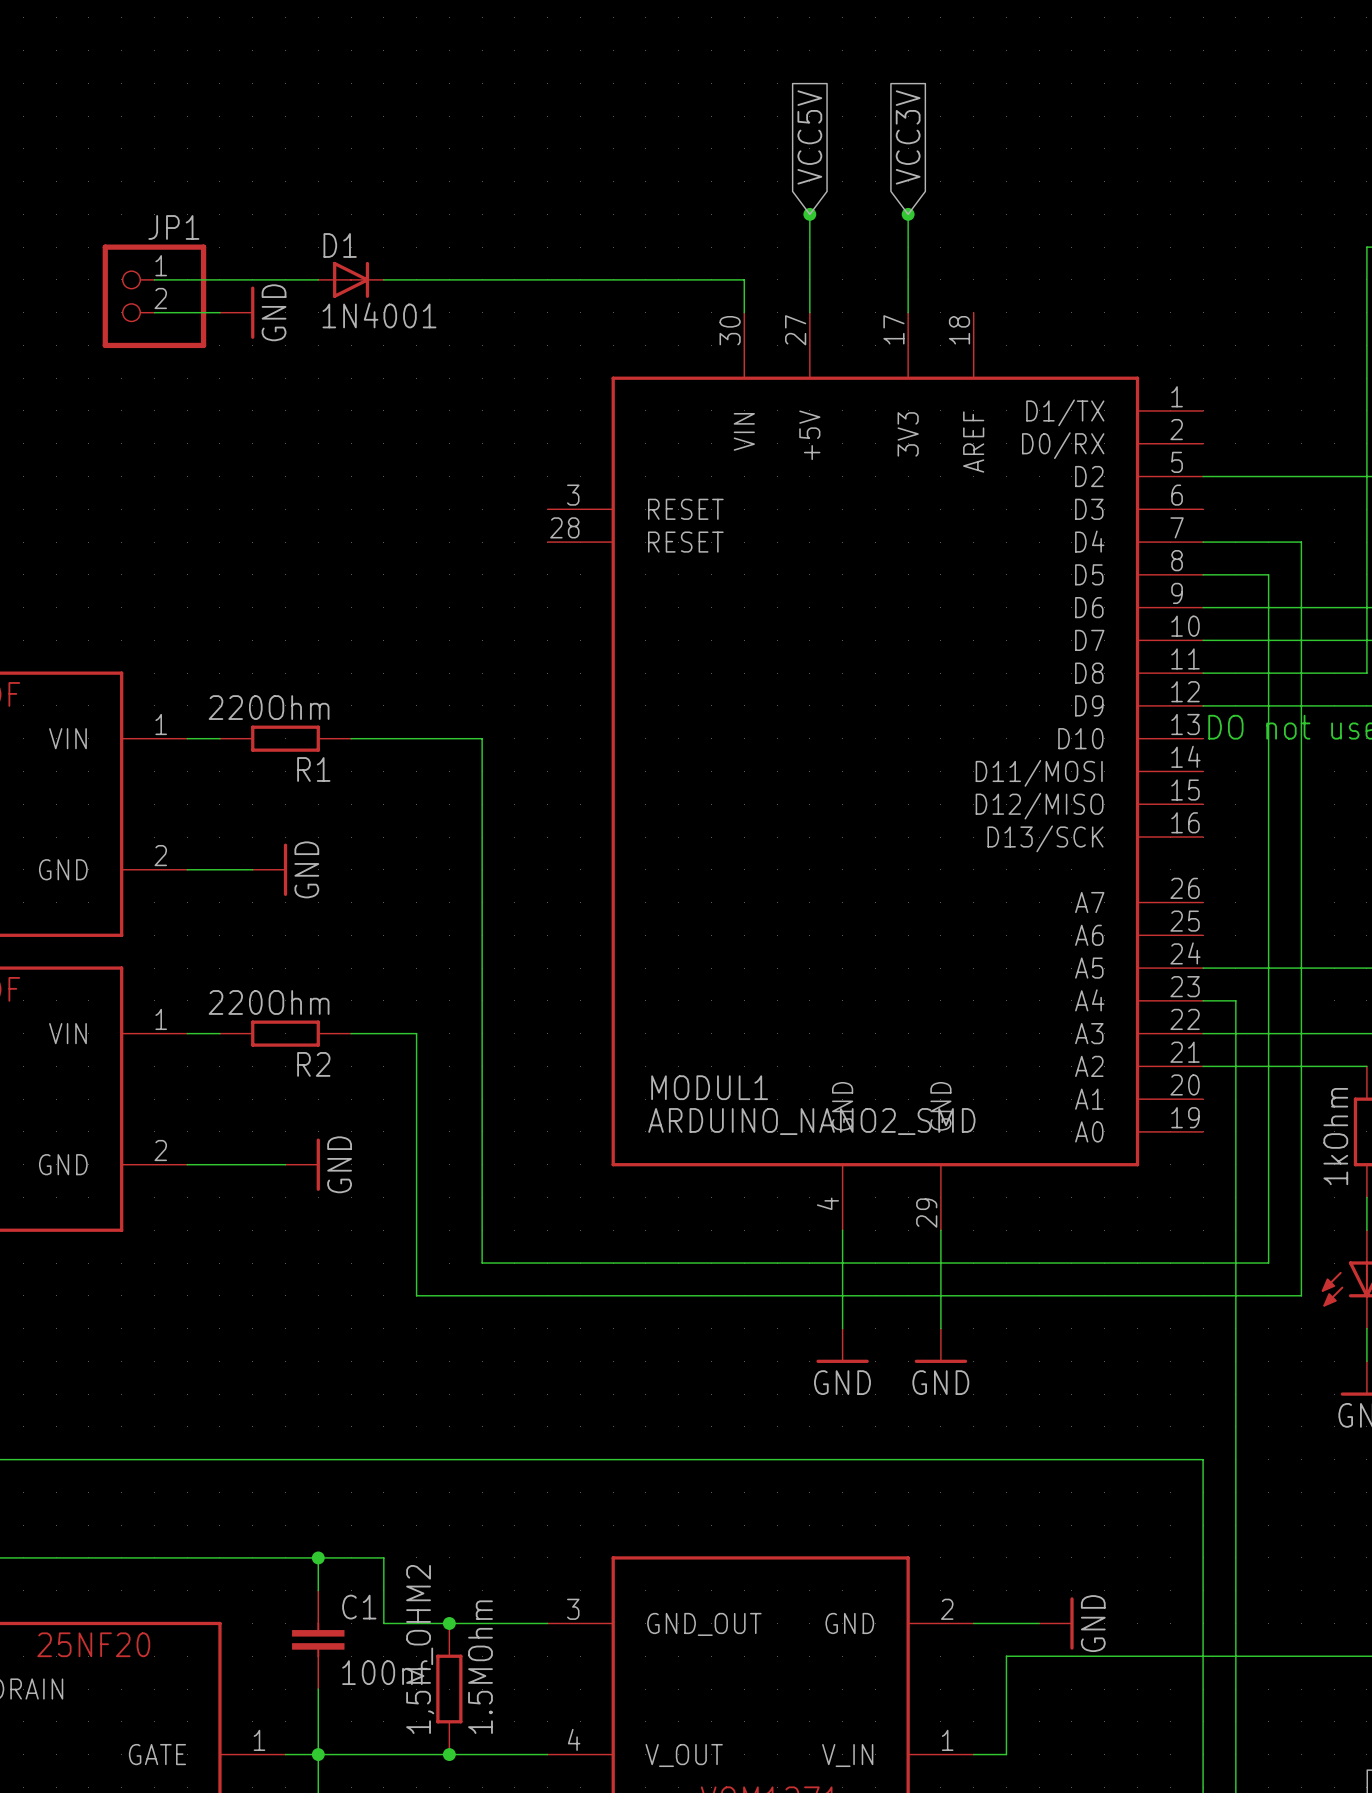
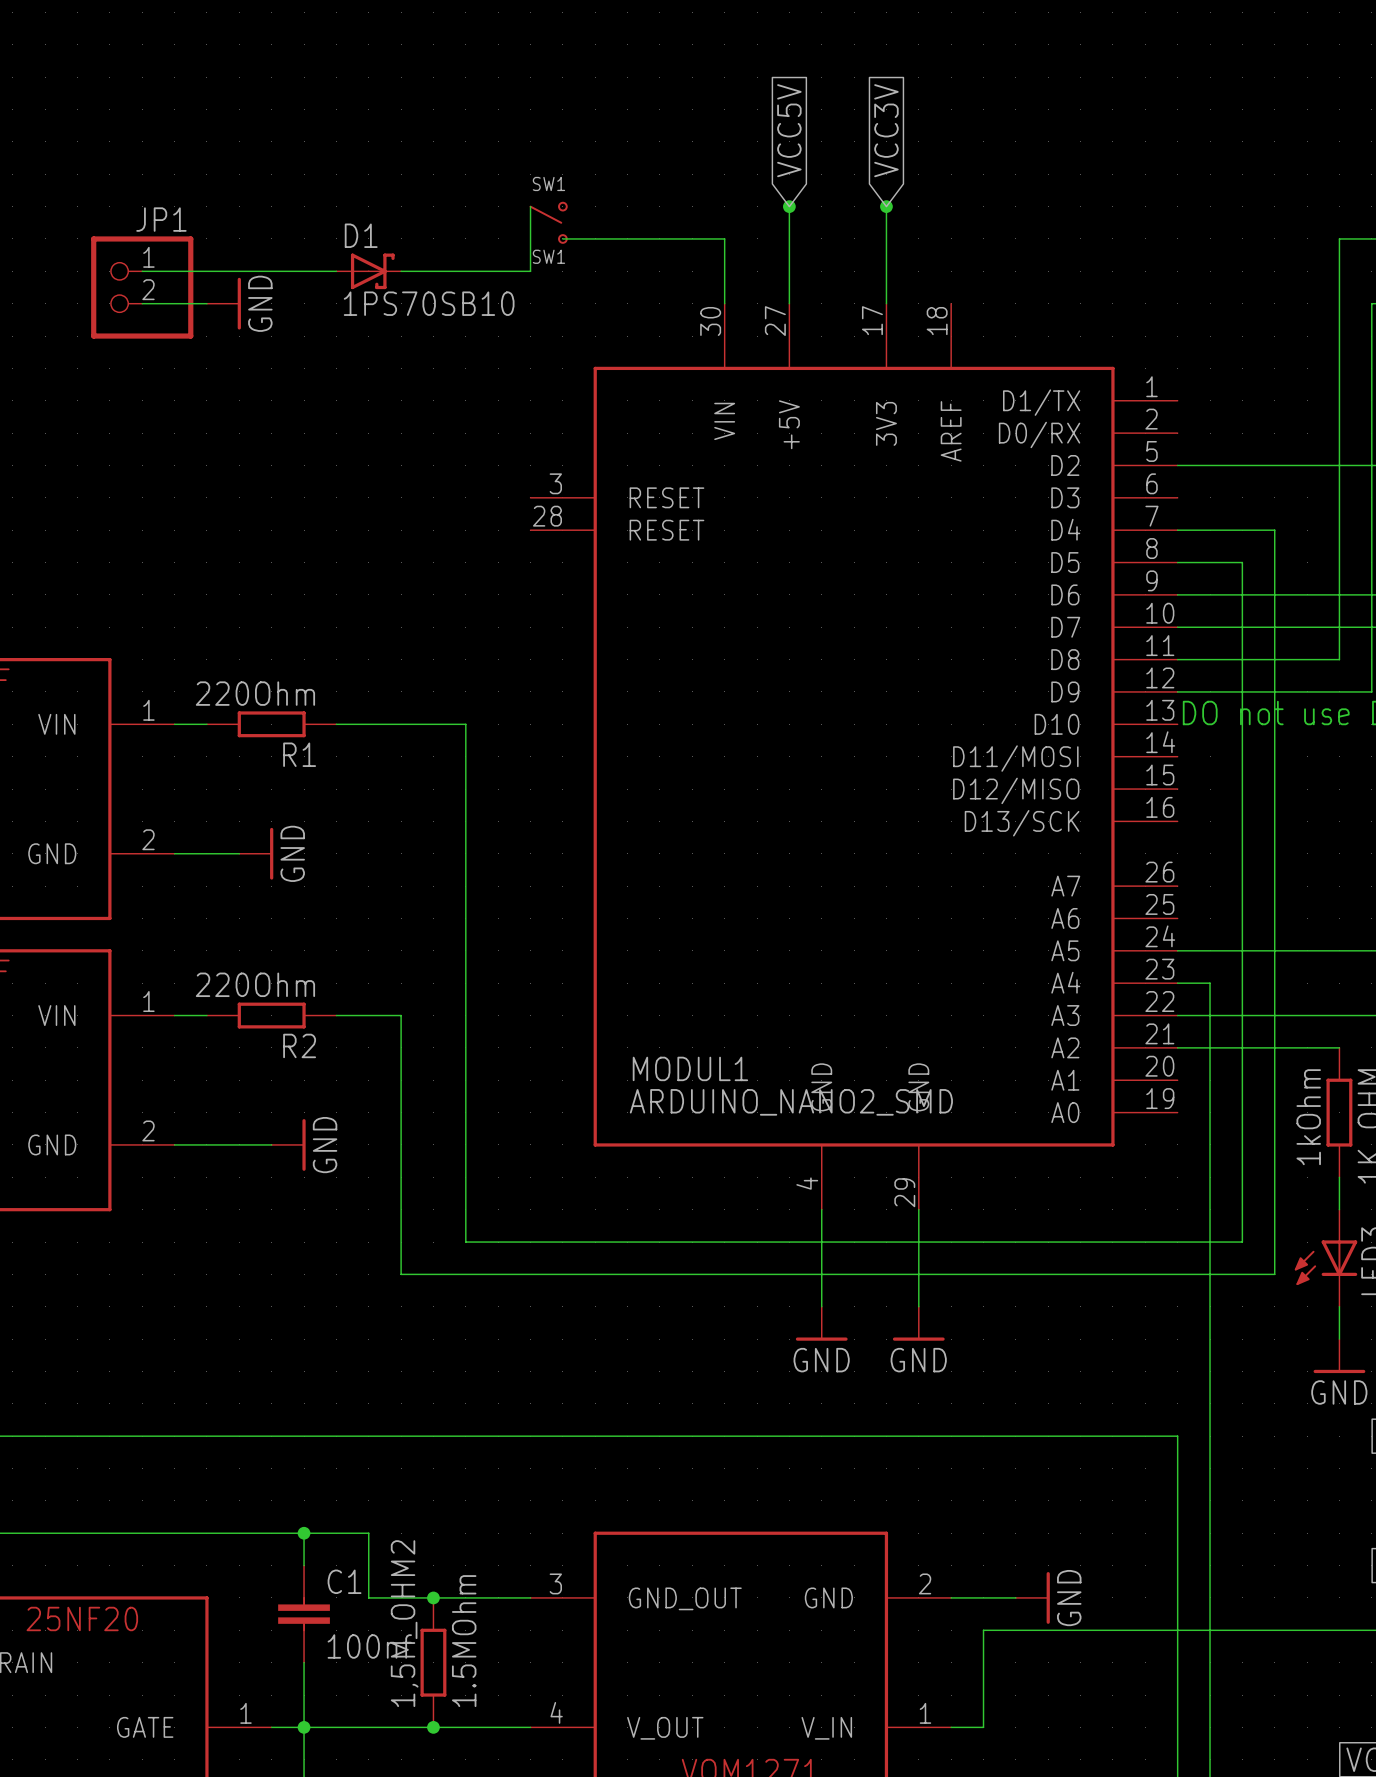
wire: none -> (530, 206) (530, 271)
SW1: none -> SW1 (548, 222)
D1 symbol: [318, 261, 384, 298] -> [336, 253, 402, 290]
wire: (547, 279) (744, 279) -> (562, 238) (724, 238) (724, 271)
D1 value: 1N4001 (379, 315) -> 1PS70SB10 (429, 303)

